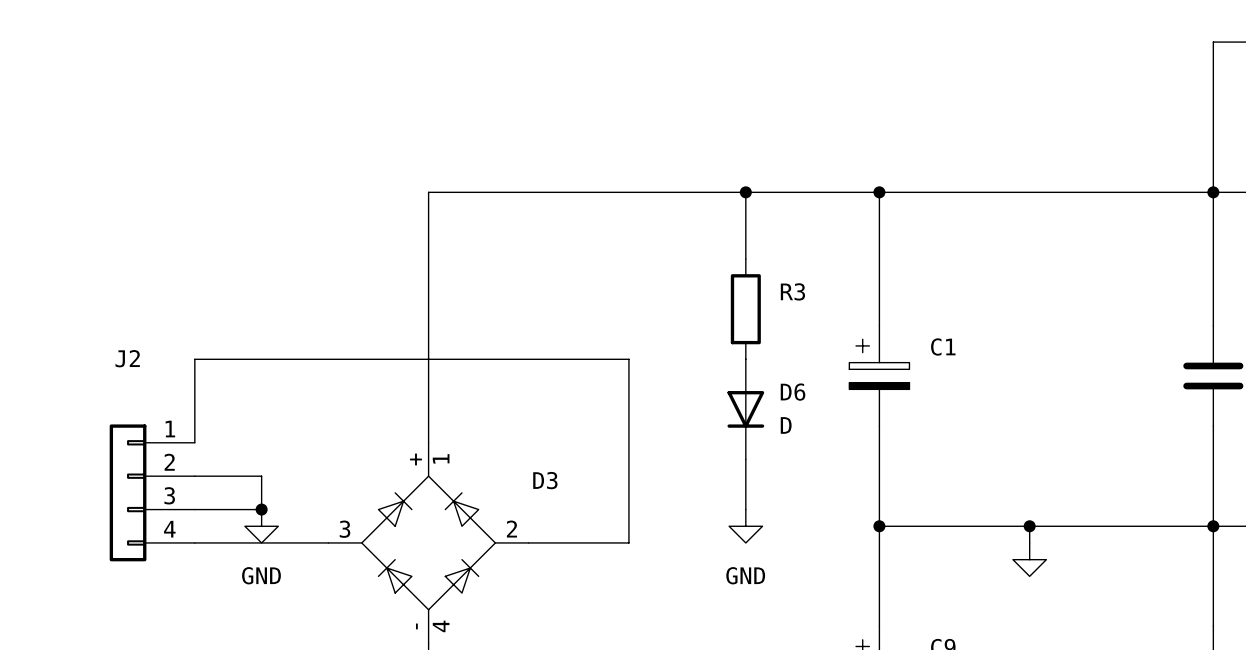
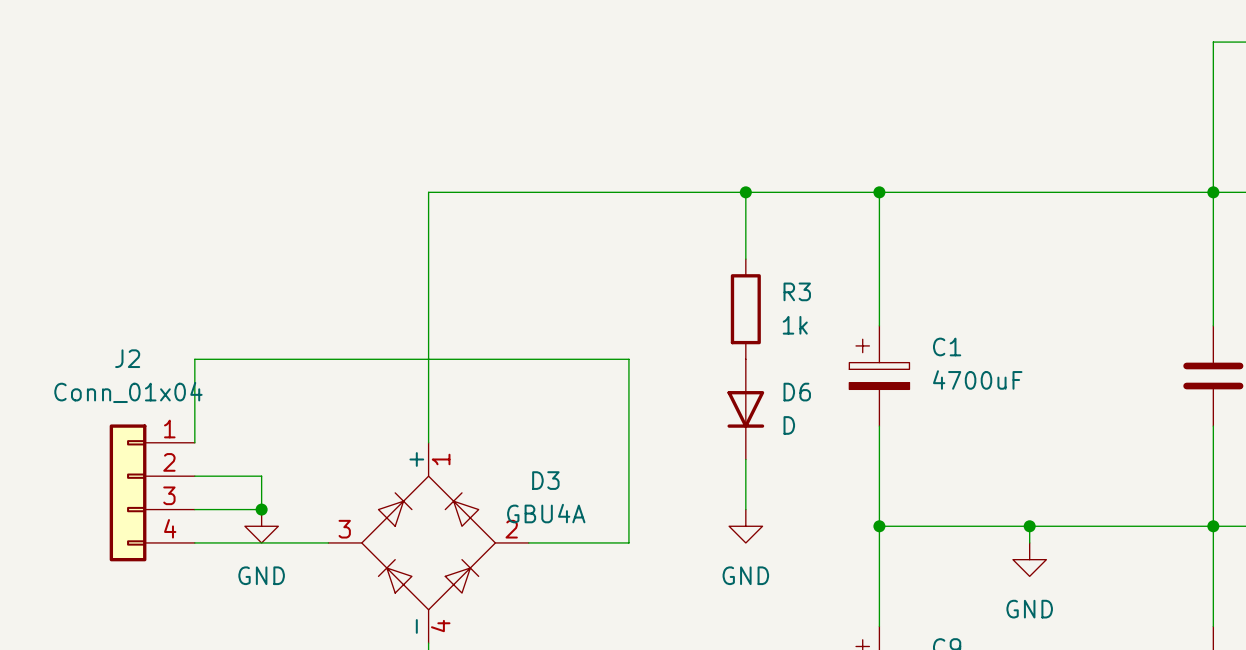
R3 value: none -> 1k (795, 325)
C1 value: none -> 4700uF (977, 379)
J2 value: none -> Conn_01x04 (128, 392)
D3 value: none -> GBU4A (546, 513)
power symbol text: none -> GND (1029, 609)

